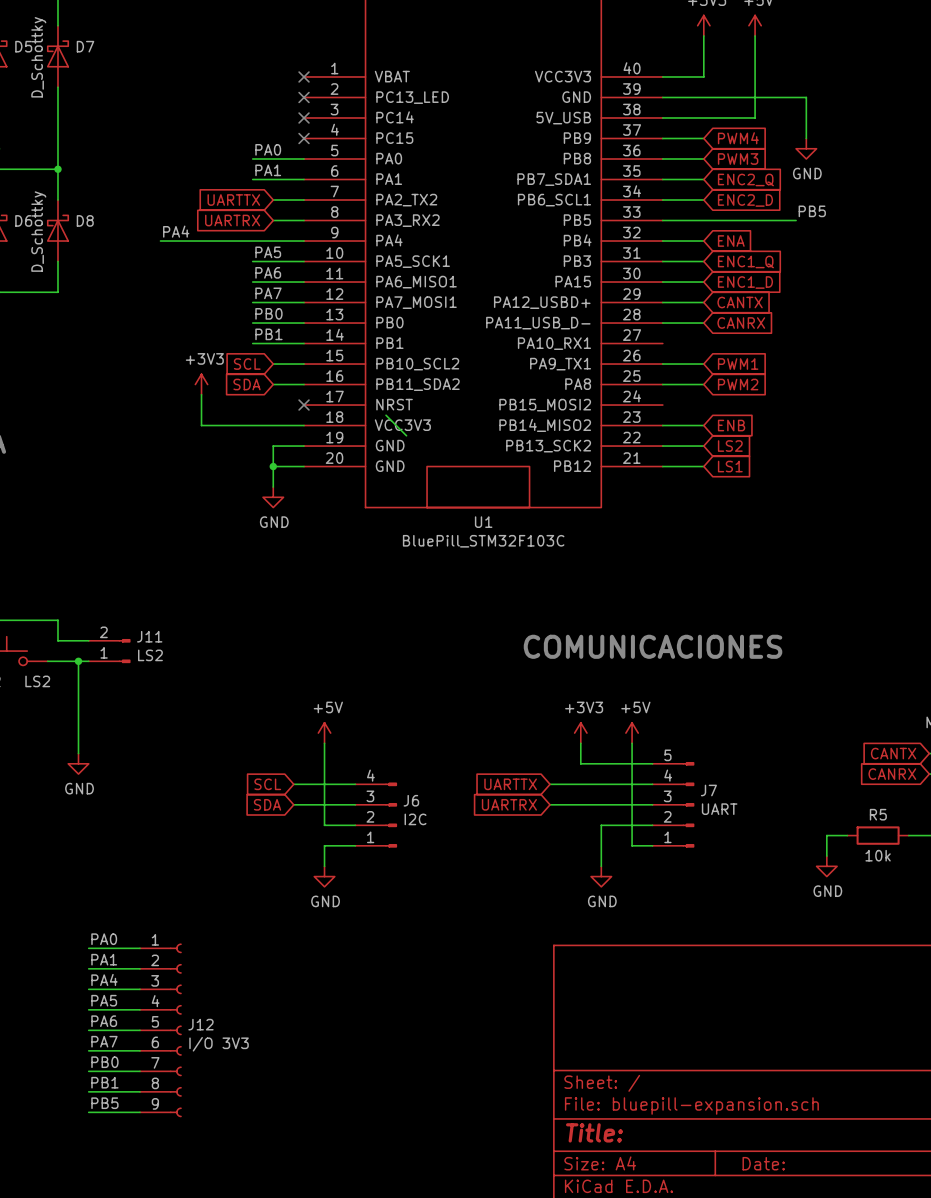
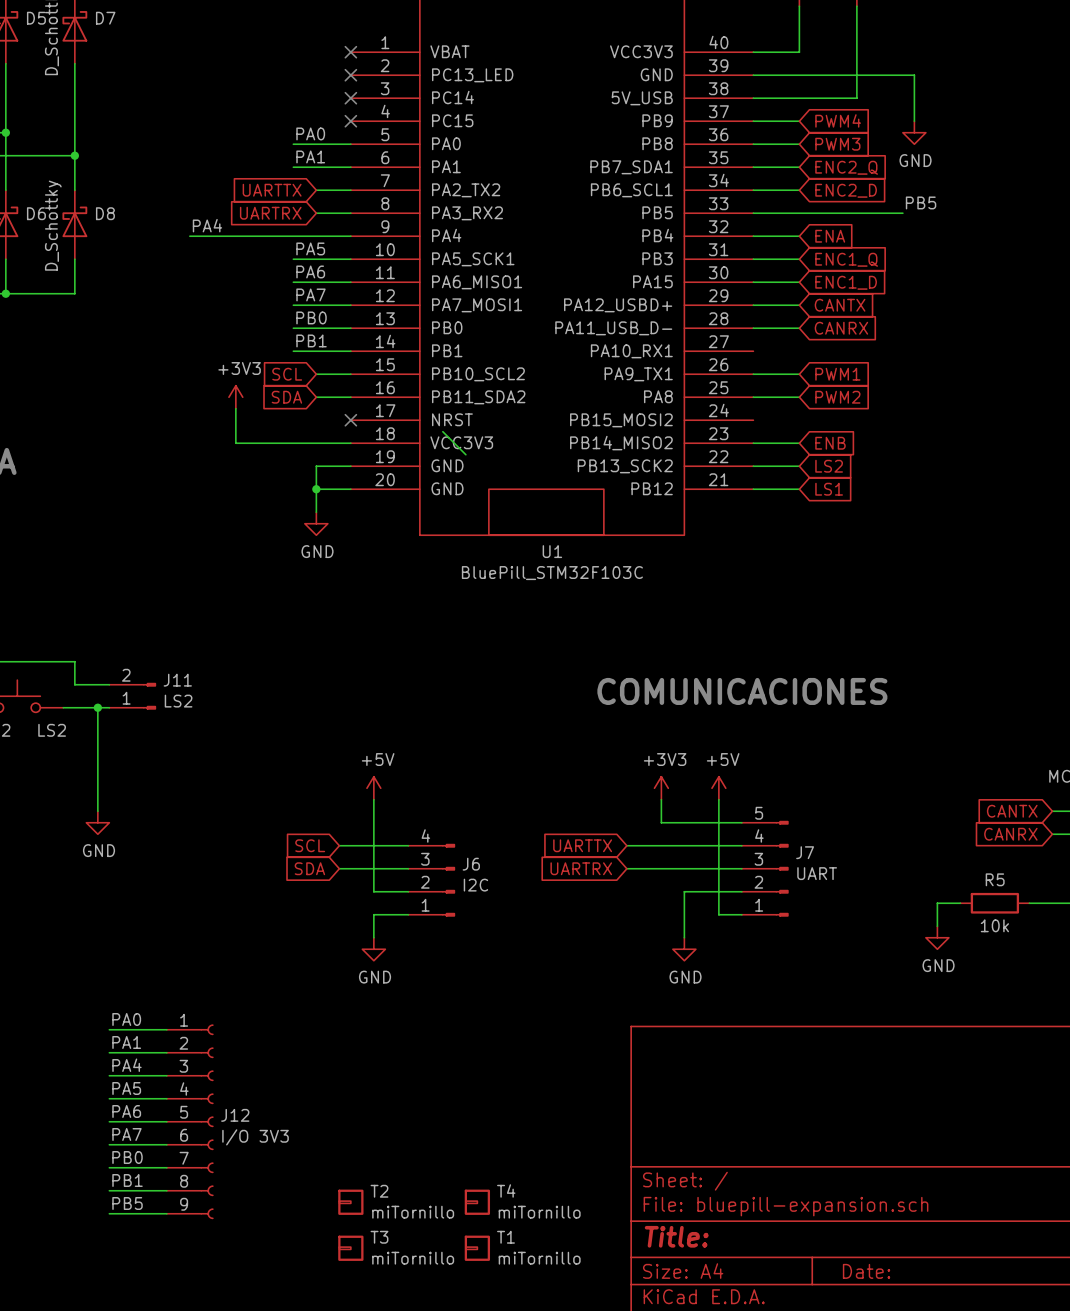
T2: none -> miTornillo (350, 1202)
T4: none -> miTornillo (477, 1202)
T3: none -> miTornillo (350, 1248)
T1: none -> miTornillo (477, 1248)

